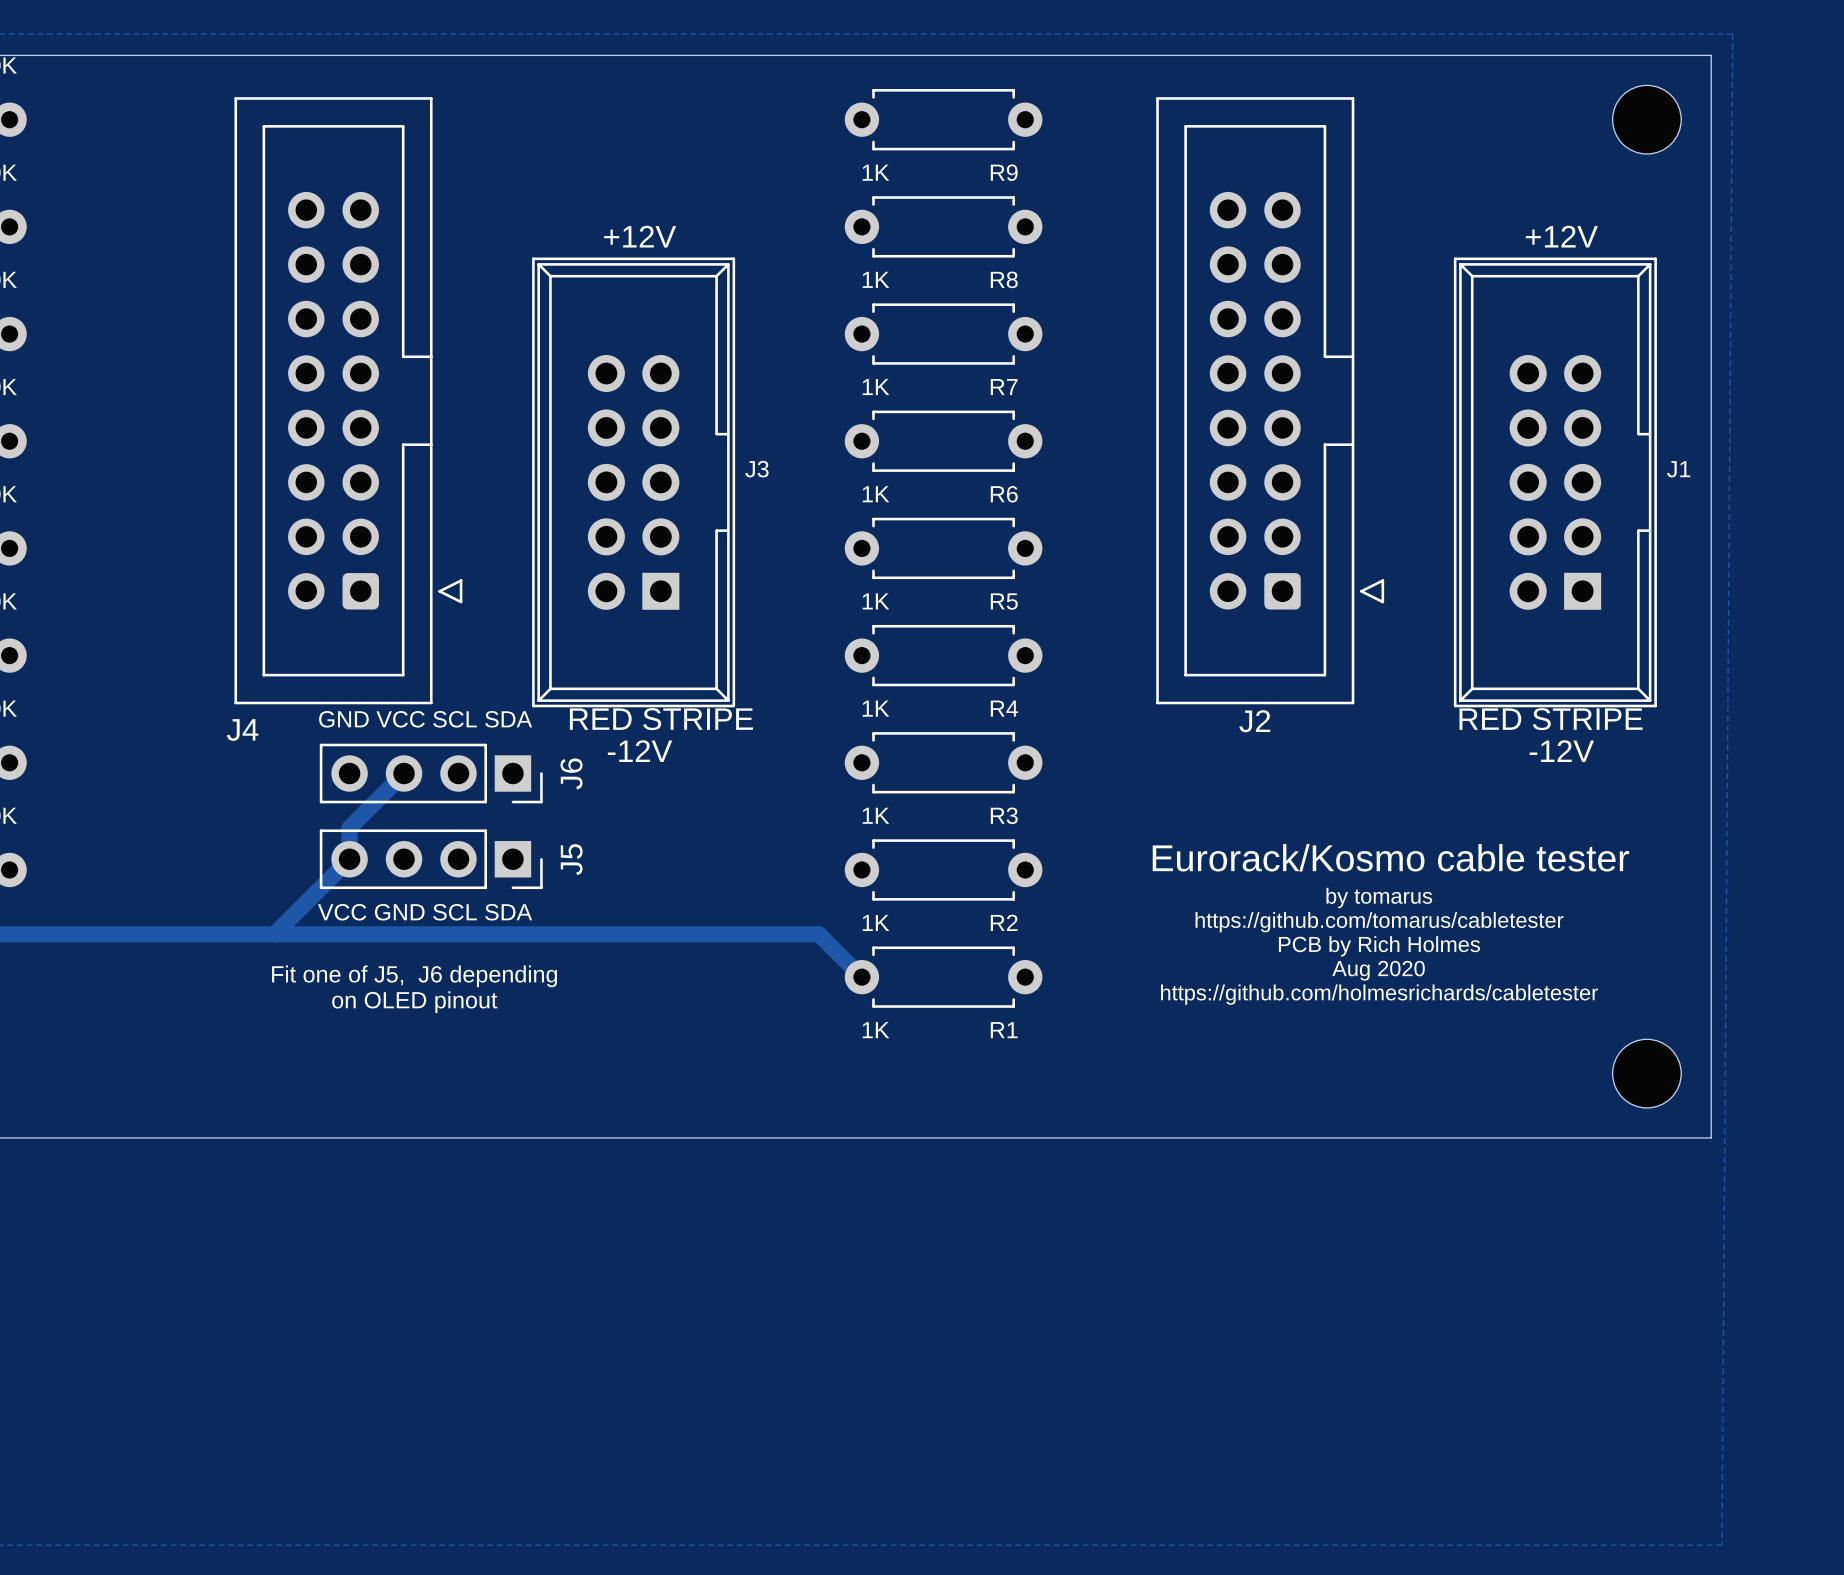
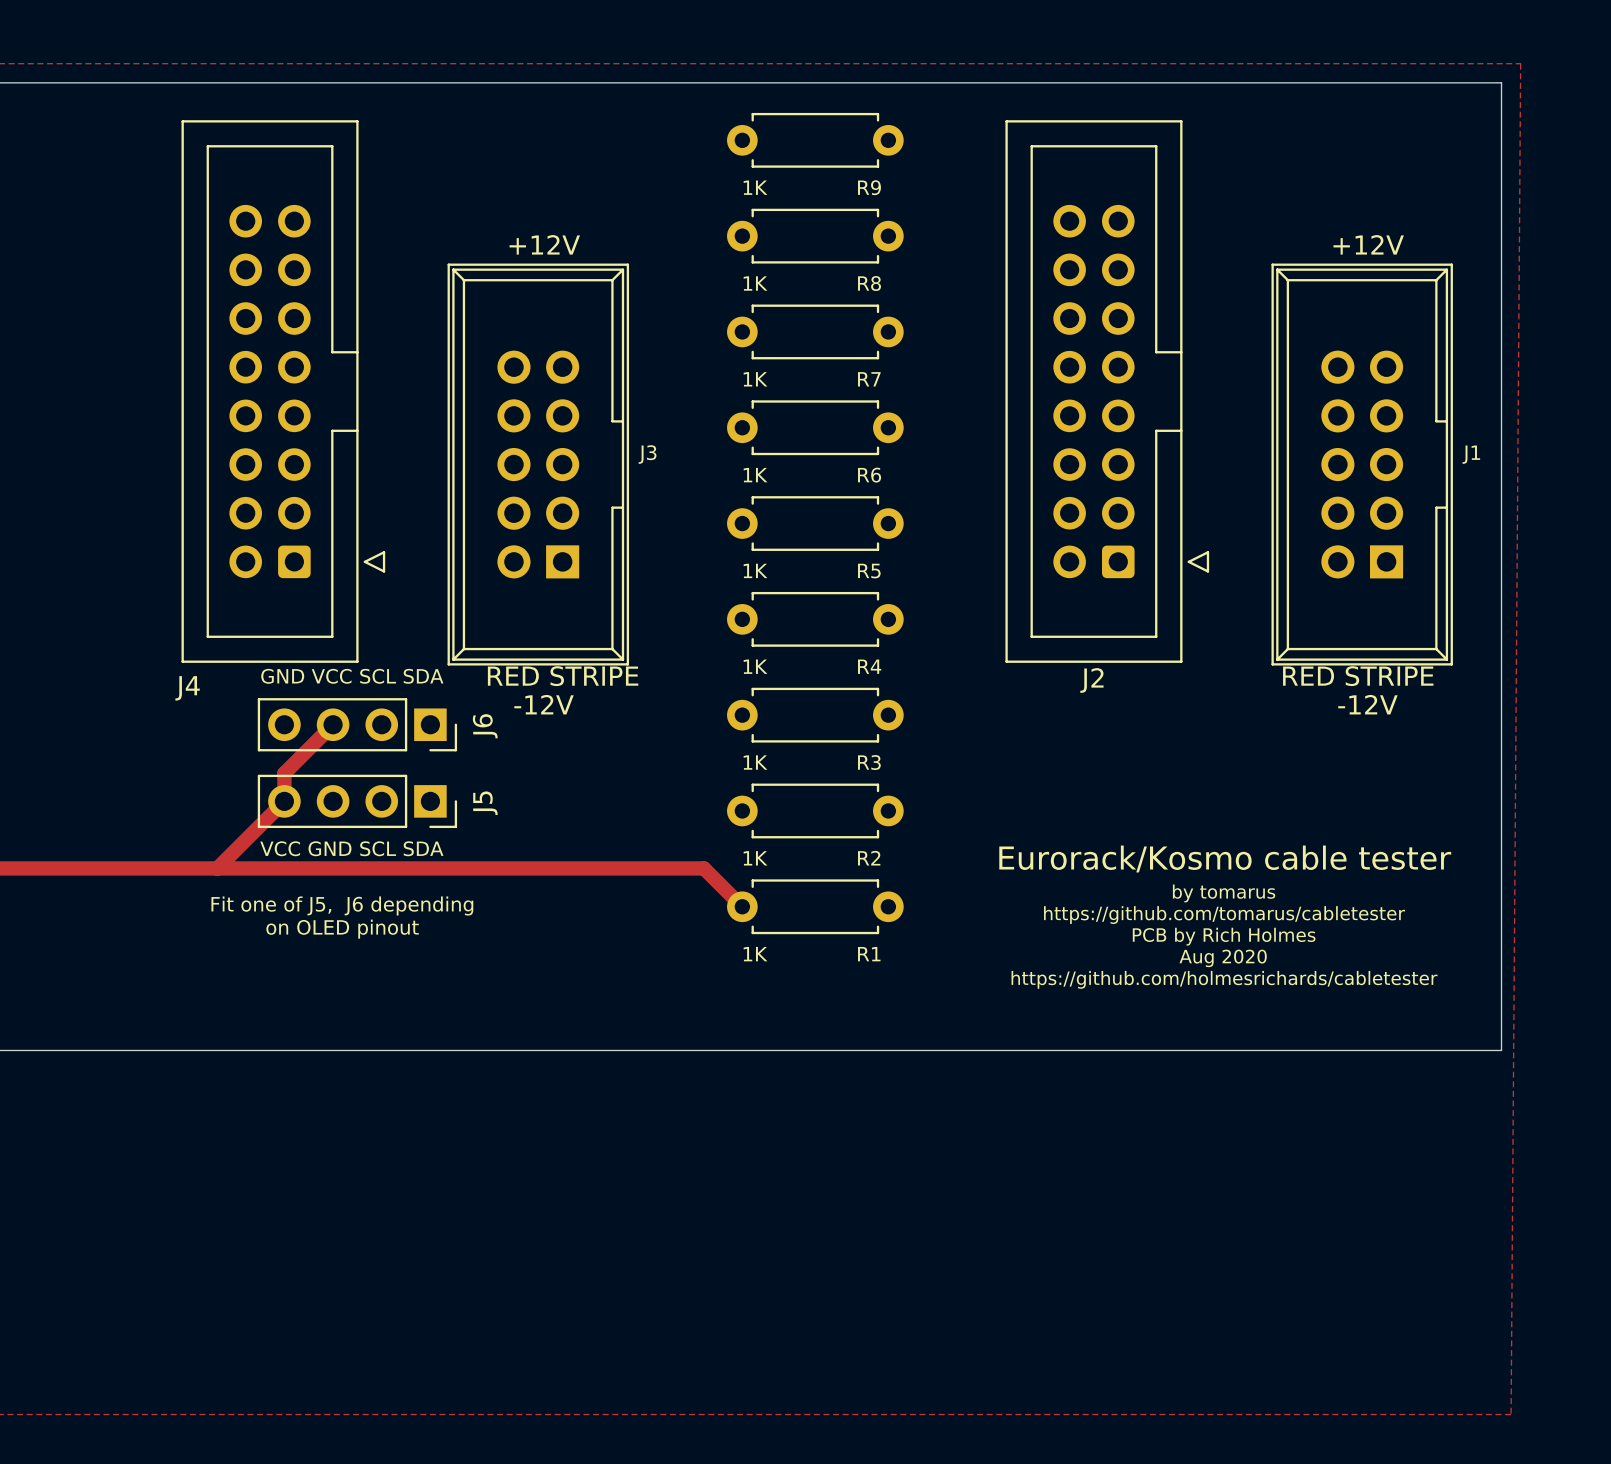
part: (1646, 119) -> none
text position: Eurorack/Kosmo cable tester (1390, 857) -> Eurorack/Kosmo cable tester (1225, 858)
text position: by tomarus (1379, 897) -> by tomarus (1224, 893)
text position: https://github.com/tomarus/cabletester (1379, 922) -> https://github.com/tomarus/cabletester (1224, 915)
text position: PCB by Rich Holmes (1379, 946) -> PCB by Rich Holmes (1224, 936)
text position: Aug 2020 (1378, 970) -> Aug 2020 (1223, 958)
text position: https://github.com/holmesrichards/cabletester (1379, 994) -> https://github.com/holmesrichards/cabletester (1224, 979)
part: (1646, 1073) -> none

